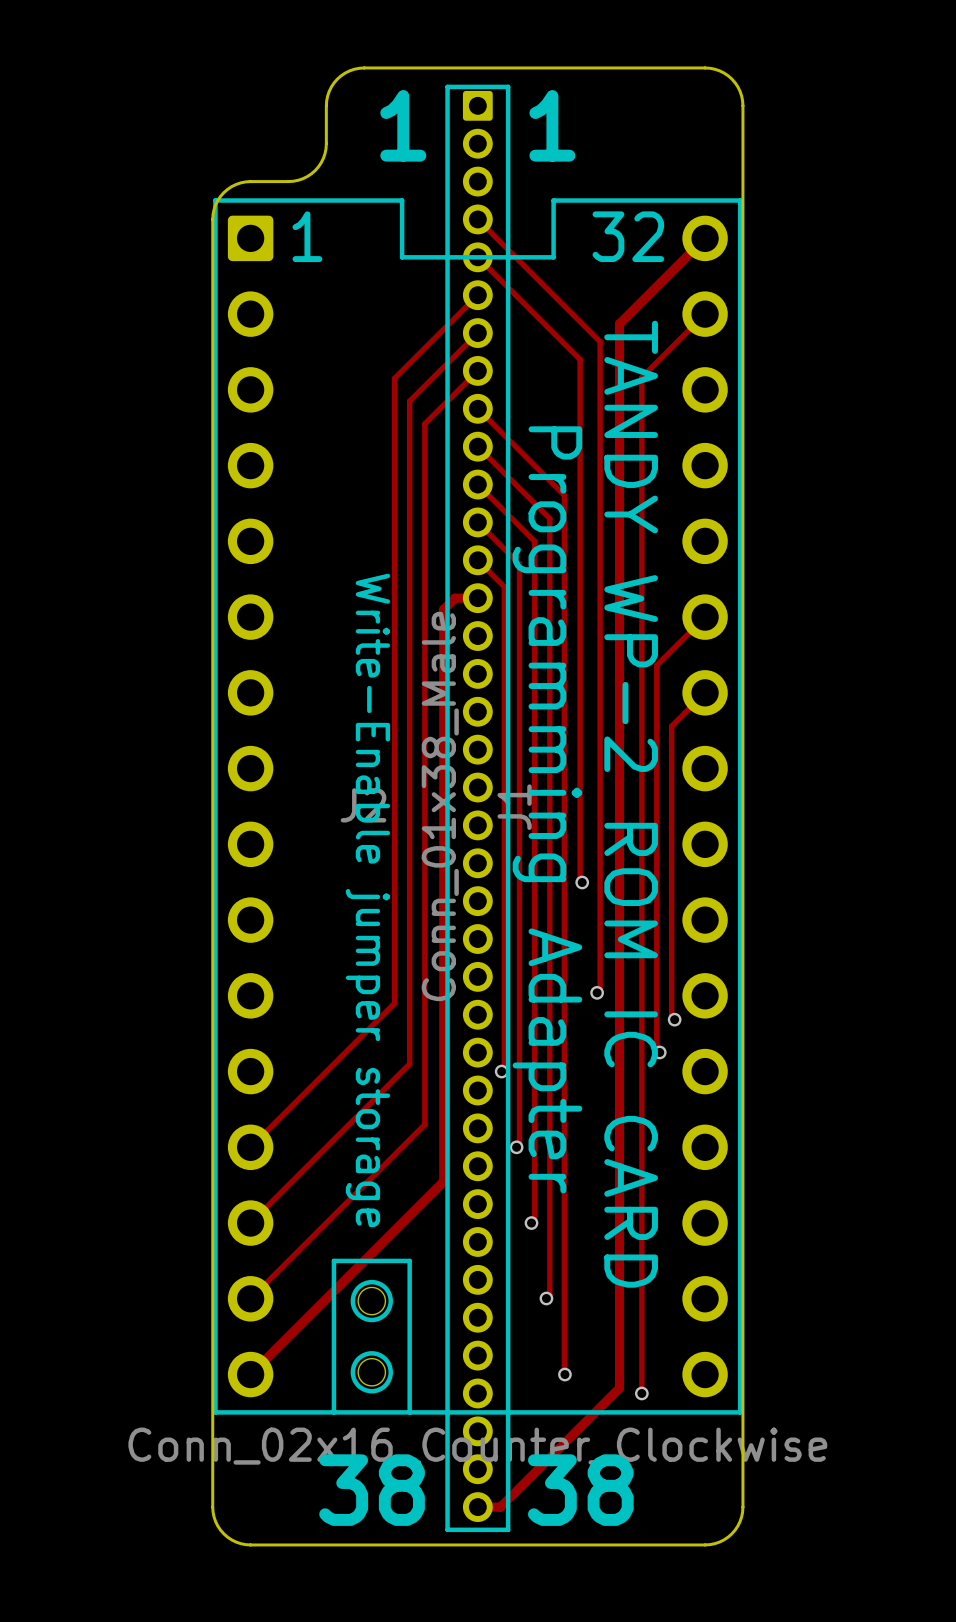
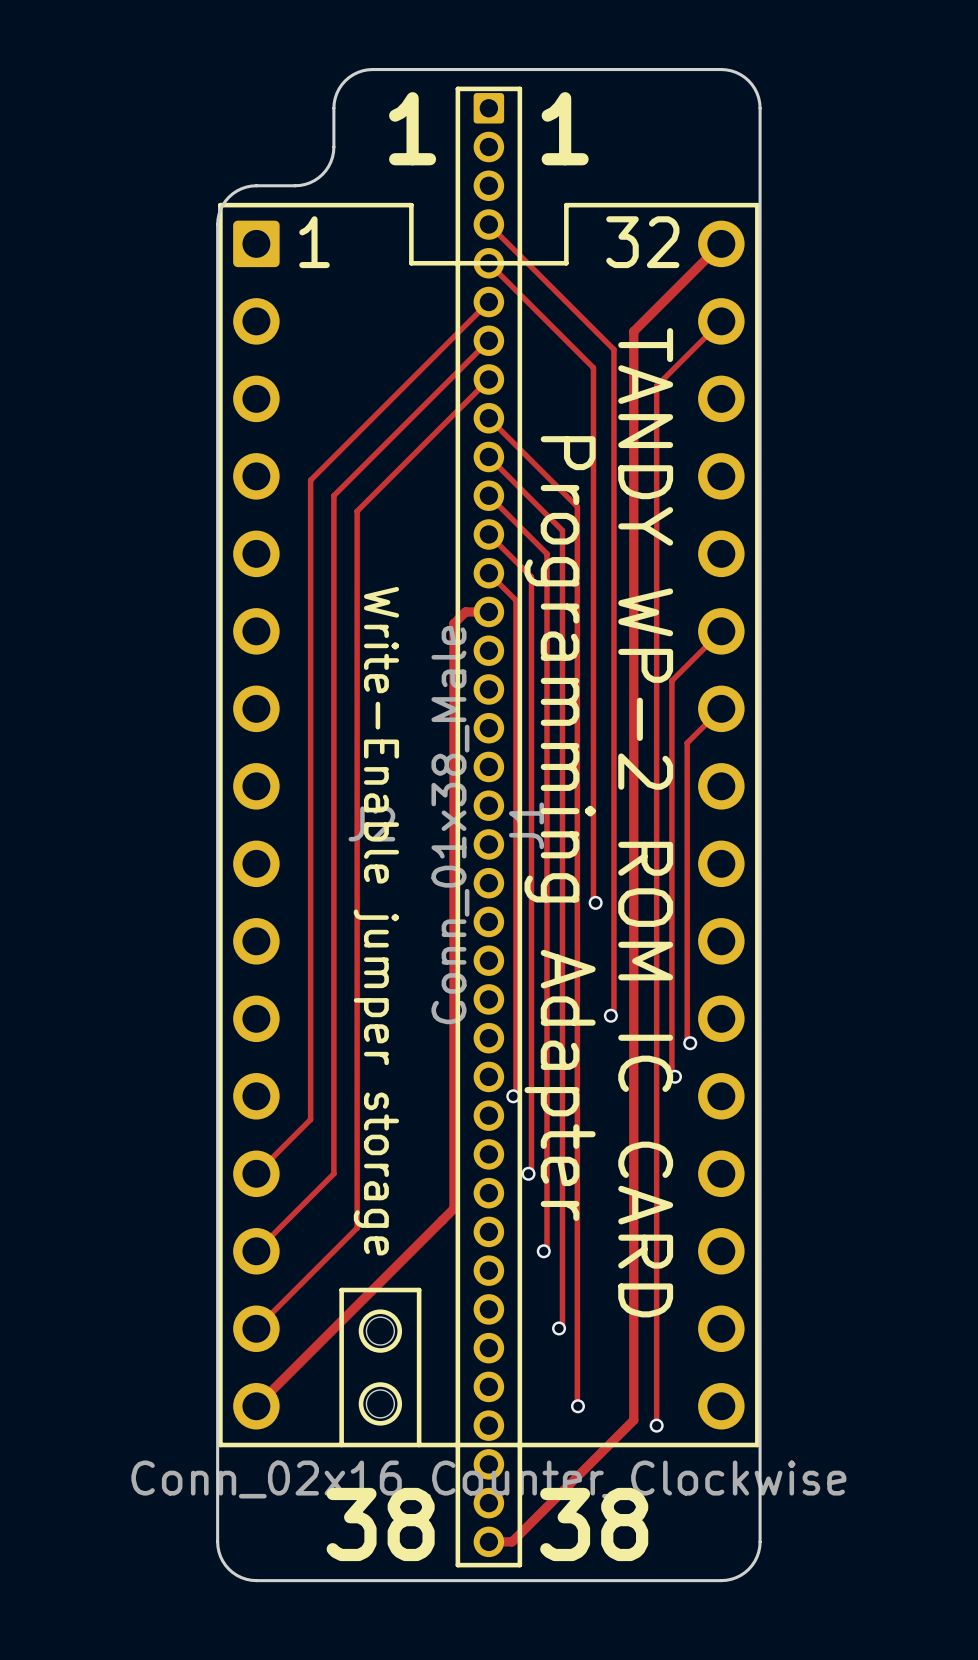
track: (394, 378) (394, 1003) (303, 1094) -> (403, 387) (310, 480) (310, 1119)
track: (409, 401) (409, 1063) (326, 1147) -> (419, 410) (333, 495) (333, 1173)
track: (424, 423) (424, 1124) (349, 1200) -> (434, 433) (357, 511) (357, 1228)

